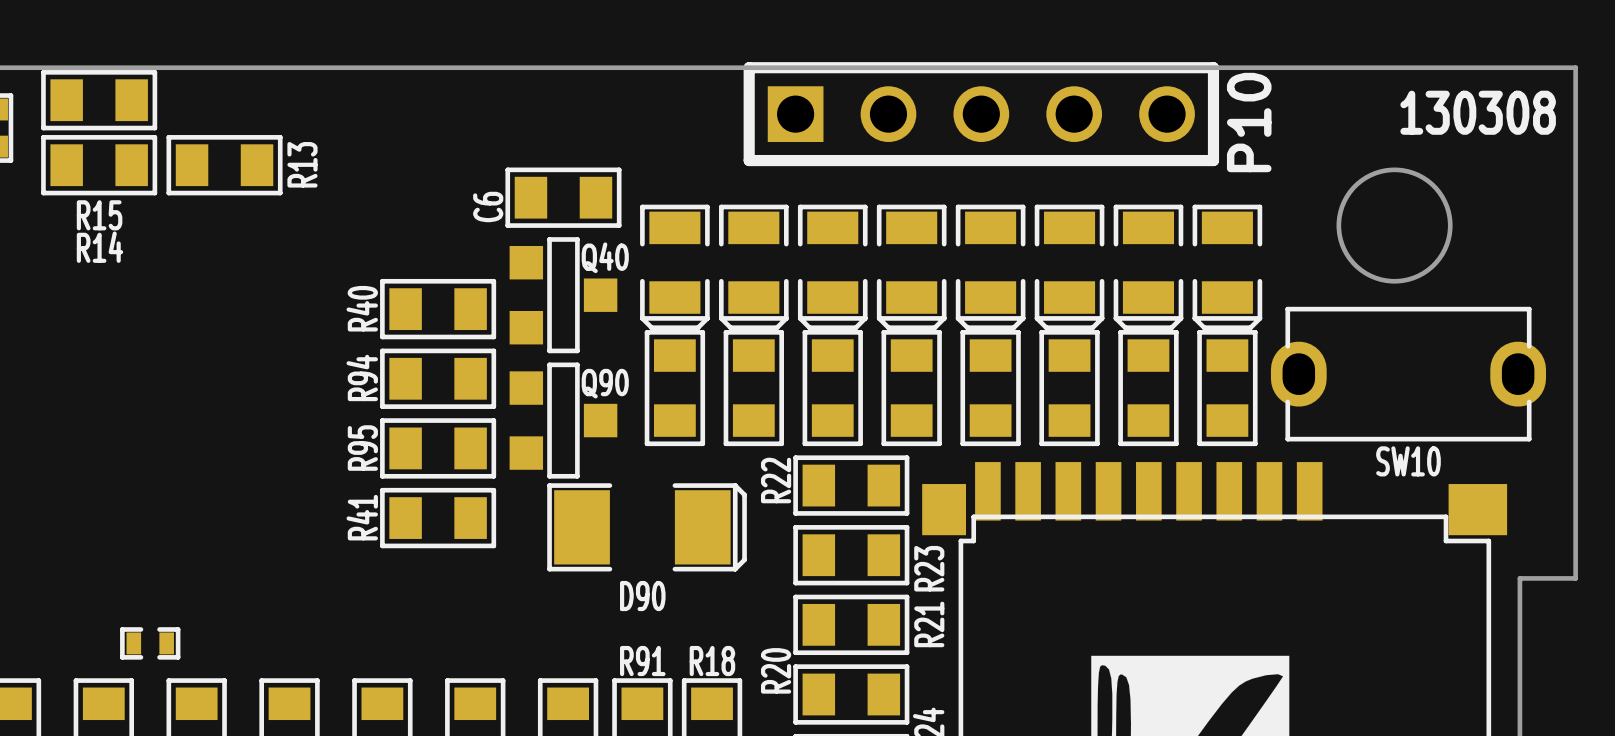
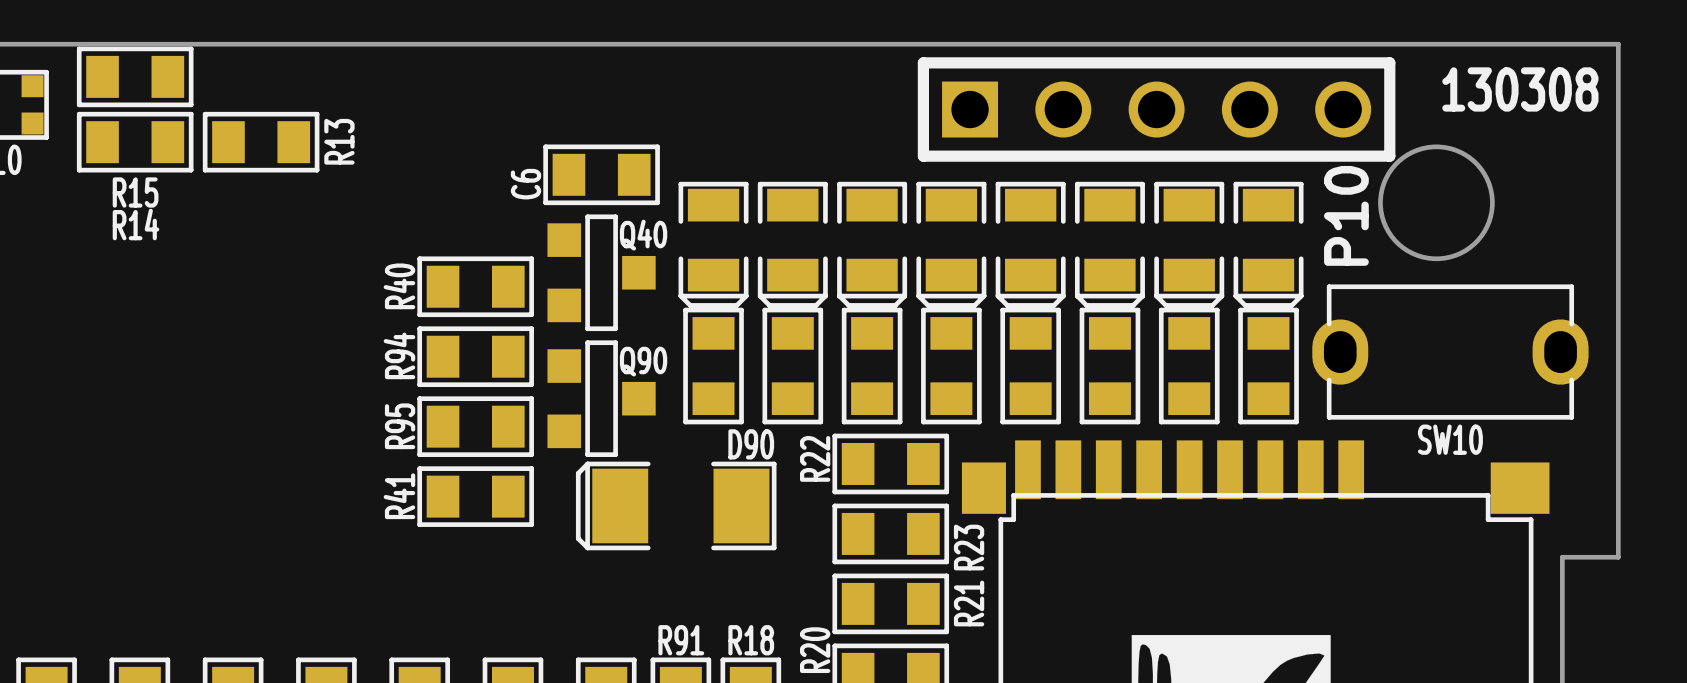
P10 position: (981, 114) -> (1156, 109)
P10 name position: P10 (1249, 122) -> P10 (1346, 215)
D90 rotation: 0° (647, 527) -> 180° (676, 505)
part: (150, 643) -> none

